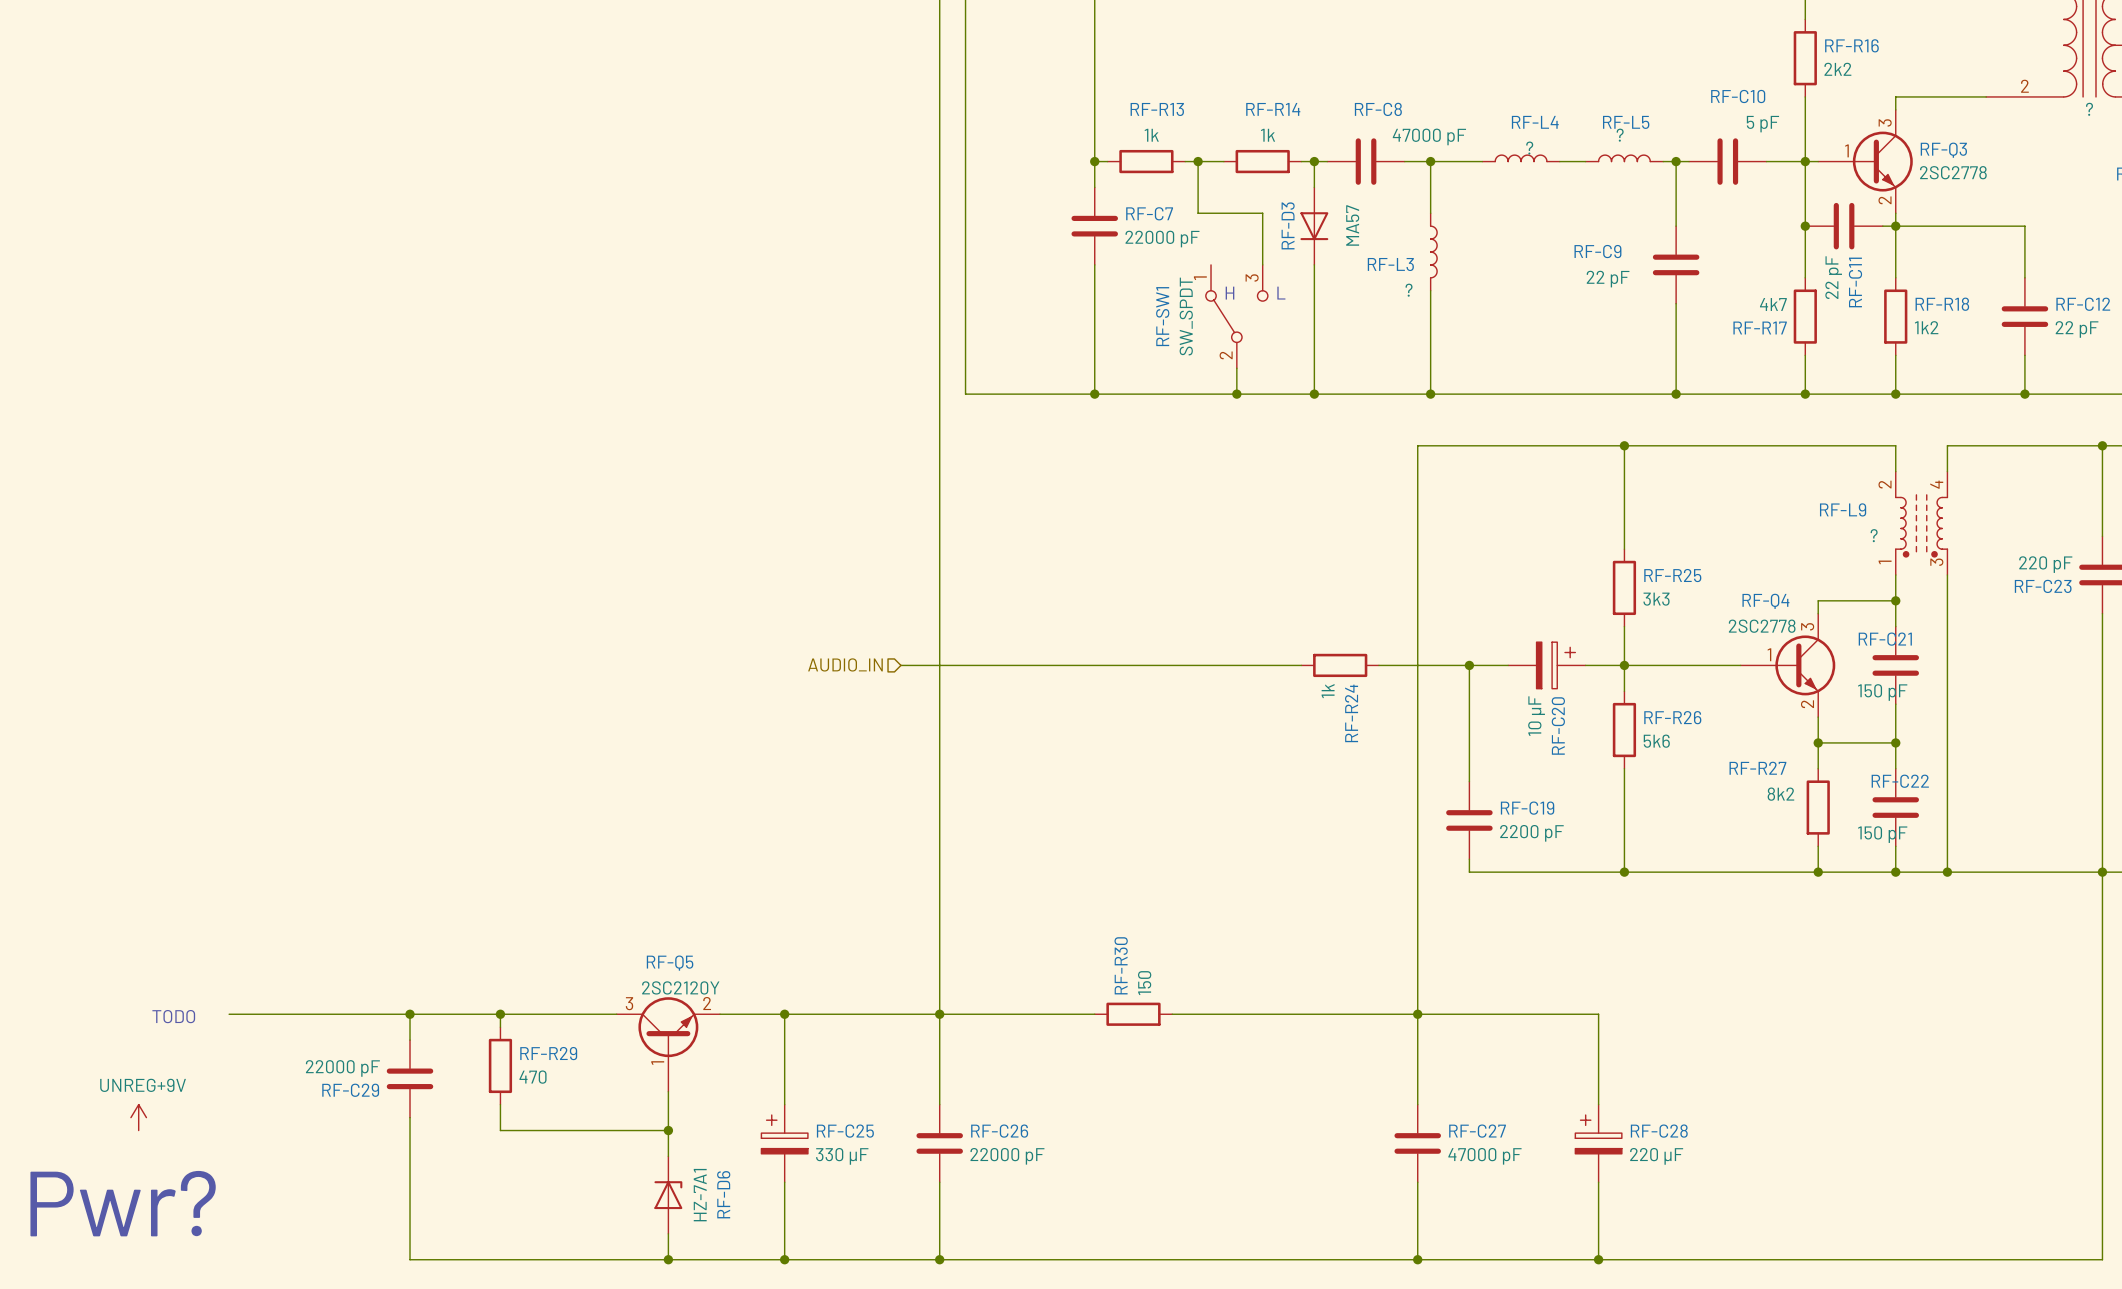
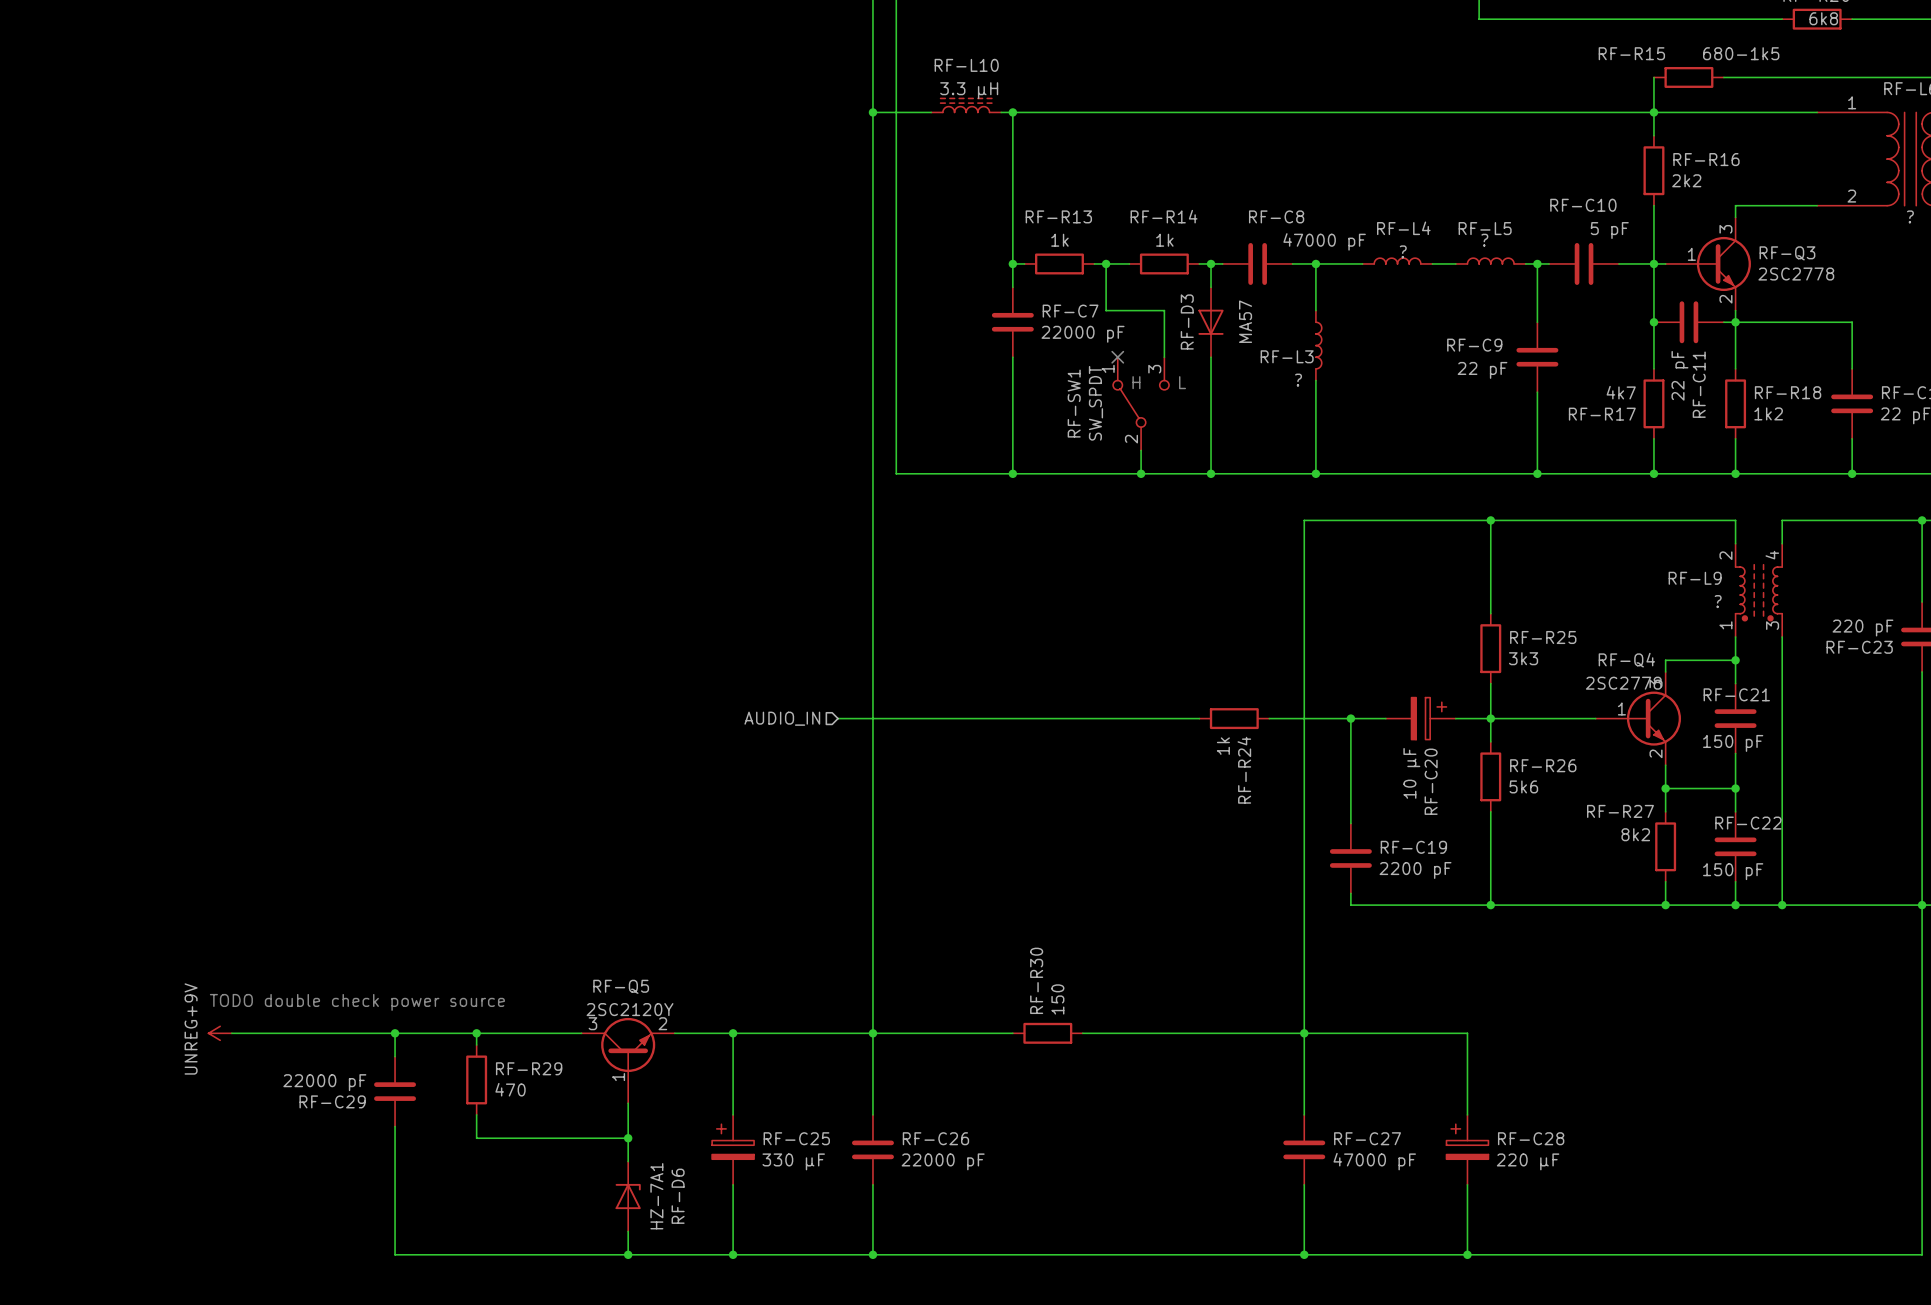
no-connect mark: none -> (1117, 357)
text: none -> TODO double check power source (357, 1002)
text: TODO (173, 1016) -> none
power symbol rotation: 0° (138, 1117) -> 90° counterclockwise (220, 1033)
power symbol position: UNREG+9V (138, 1117) -> UNREG+9V (220, 1033)
text: Pwr? (123, 1203) -> none

